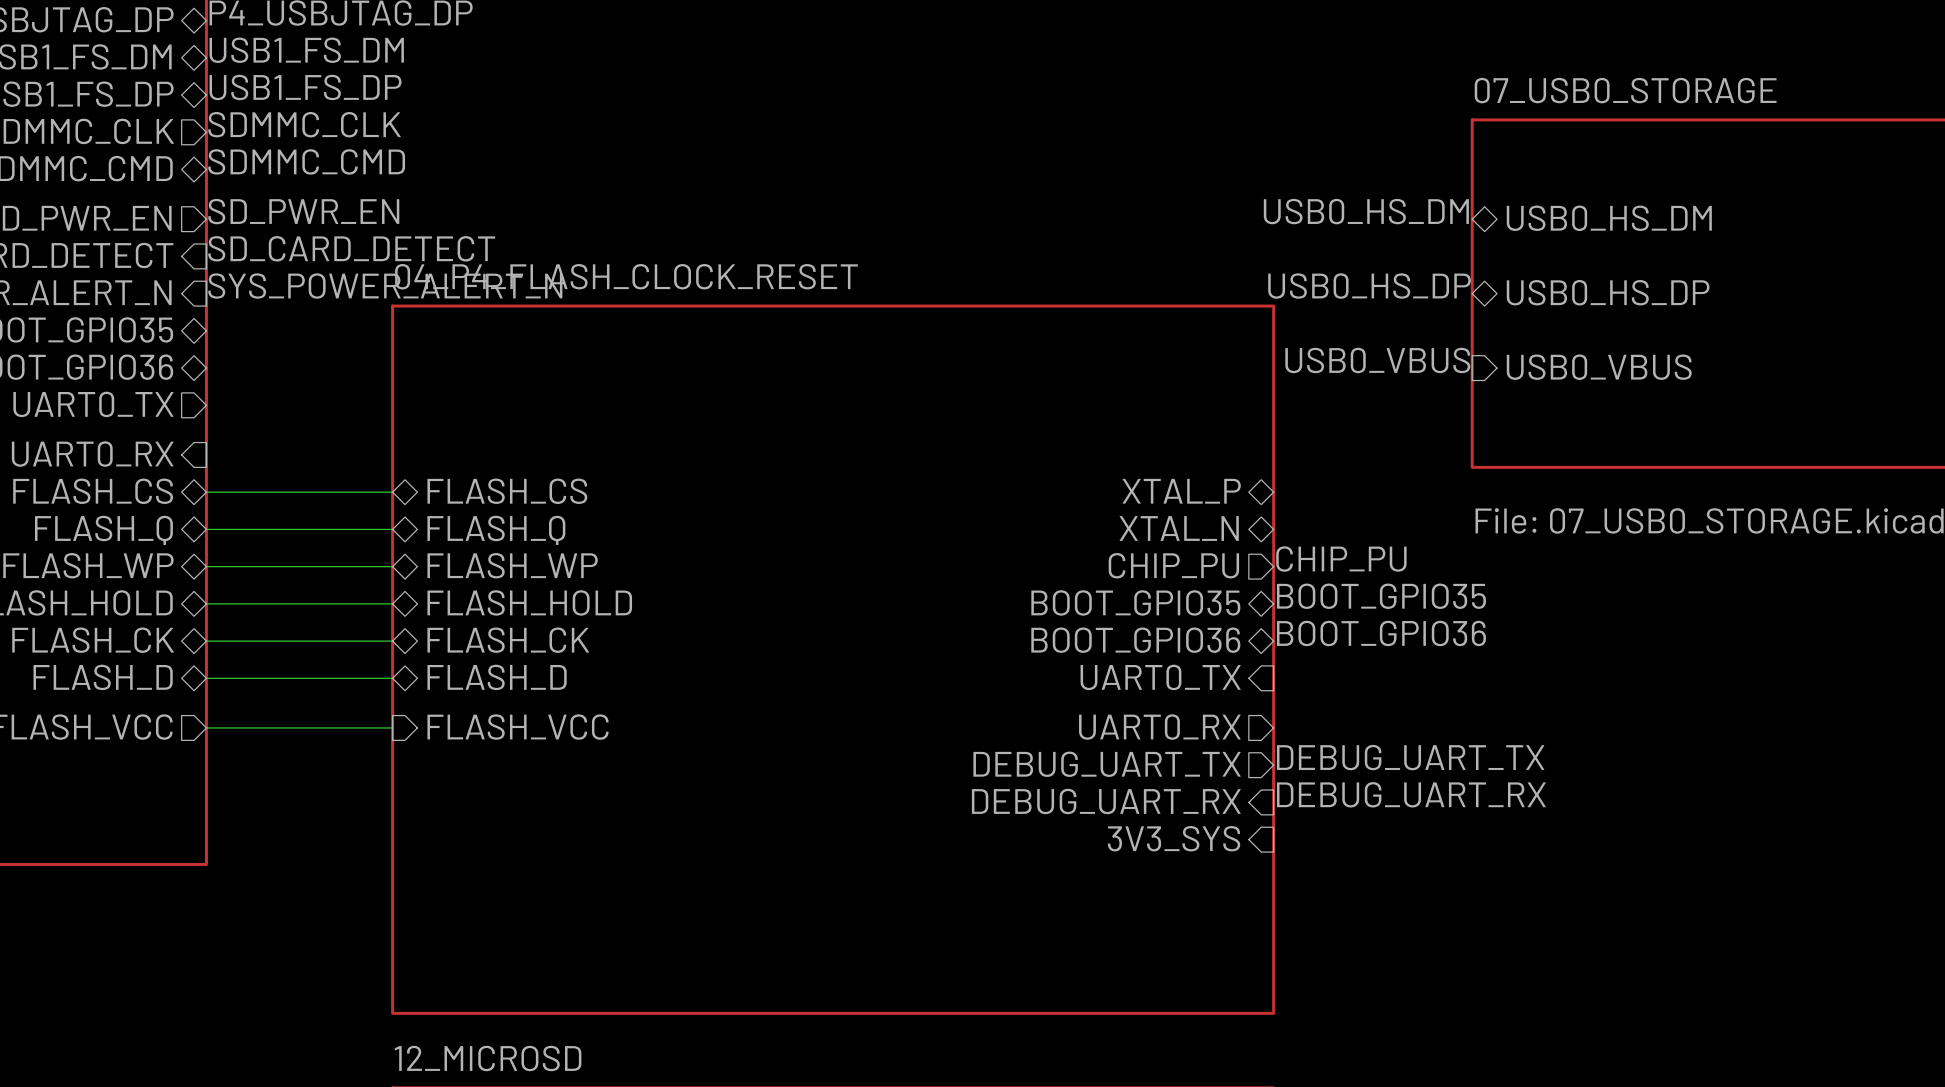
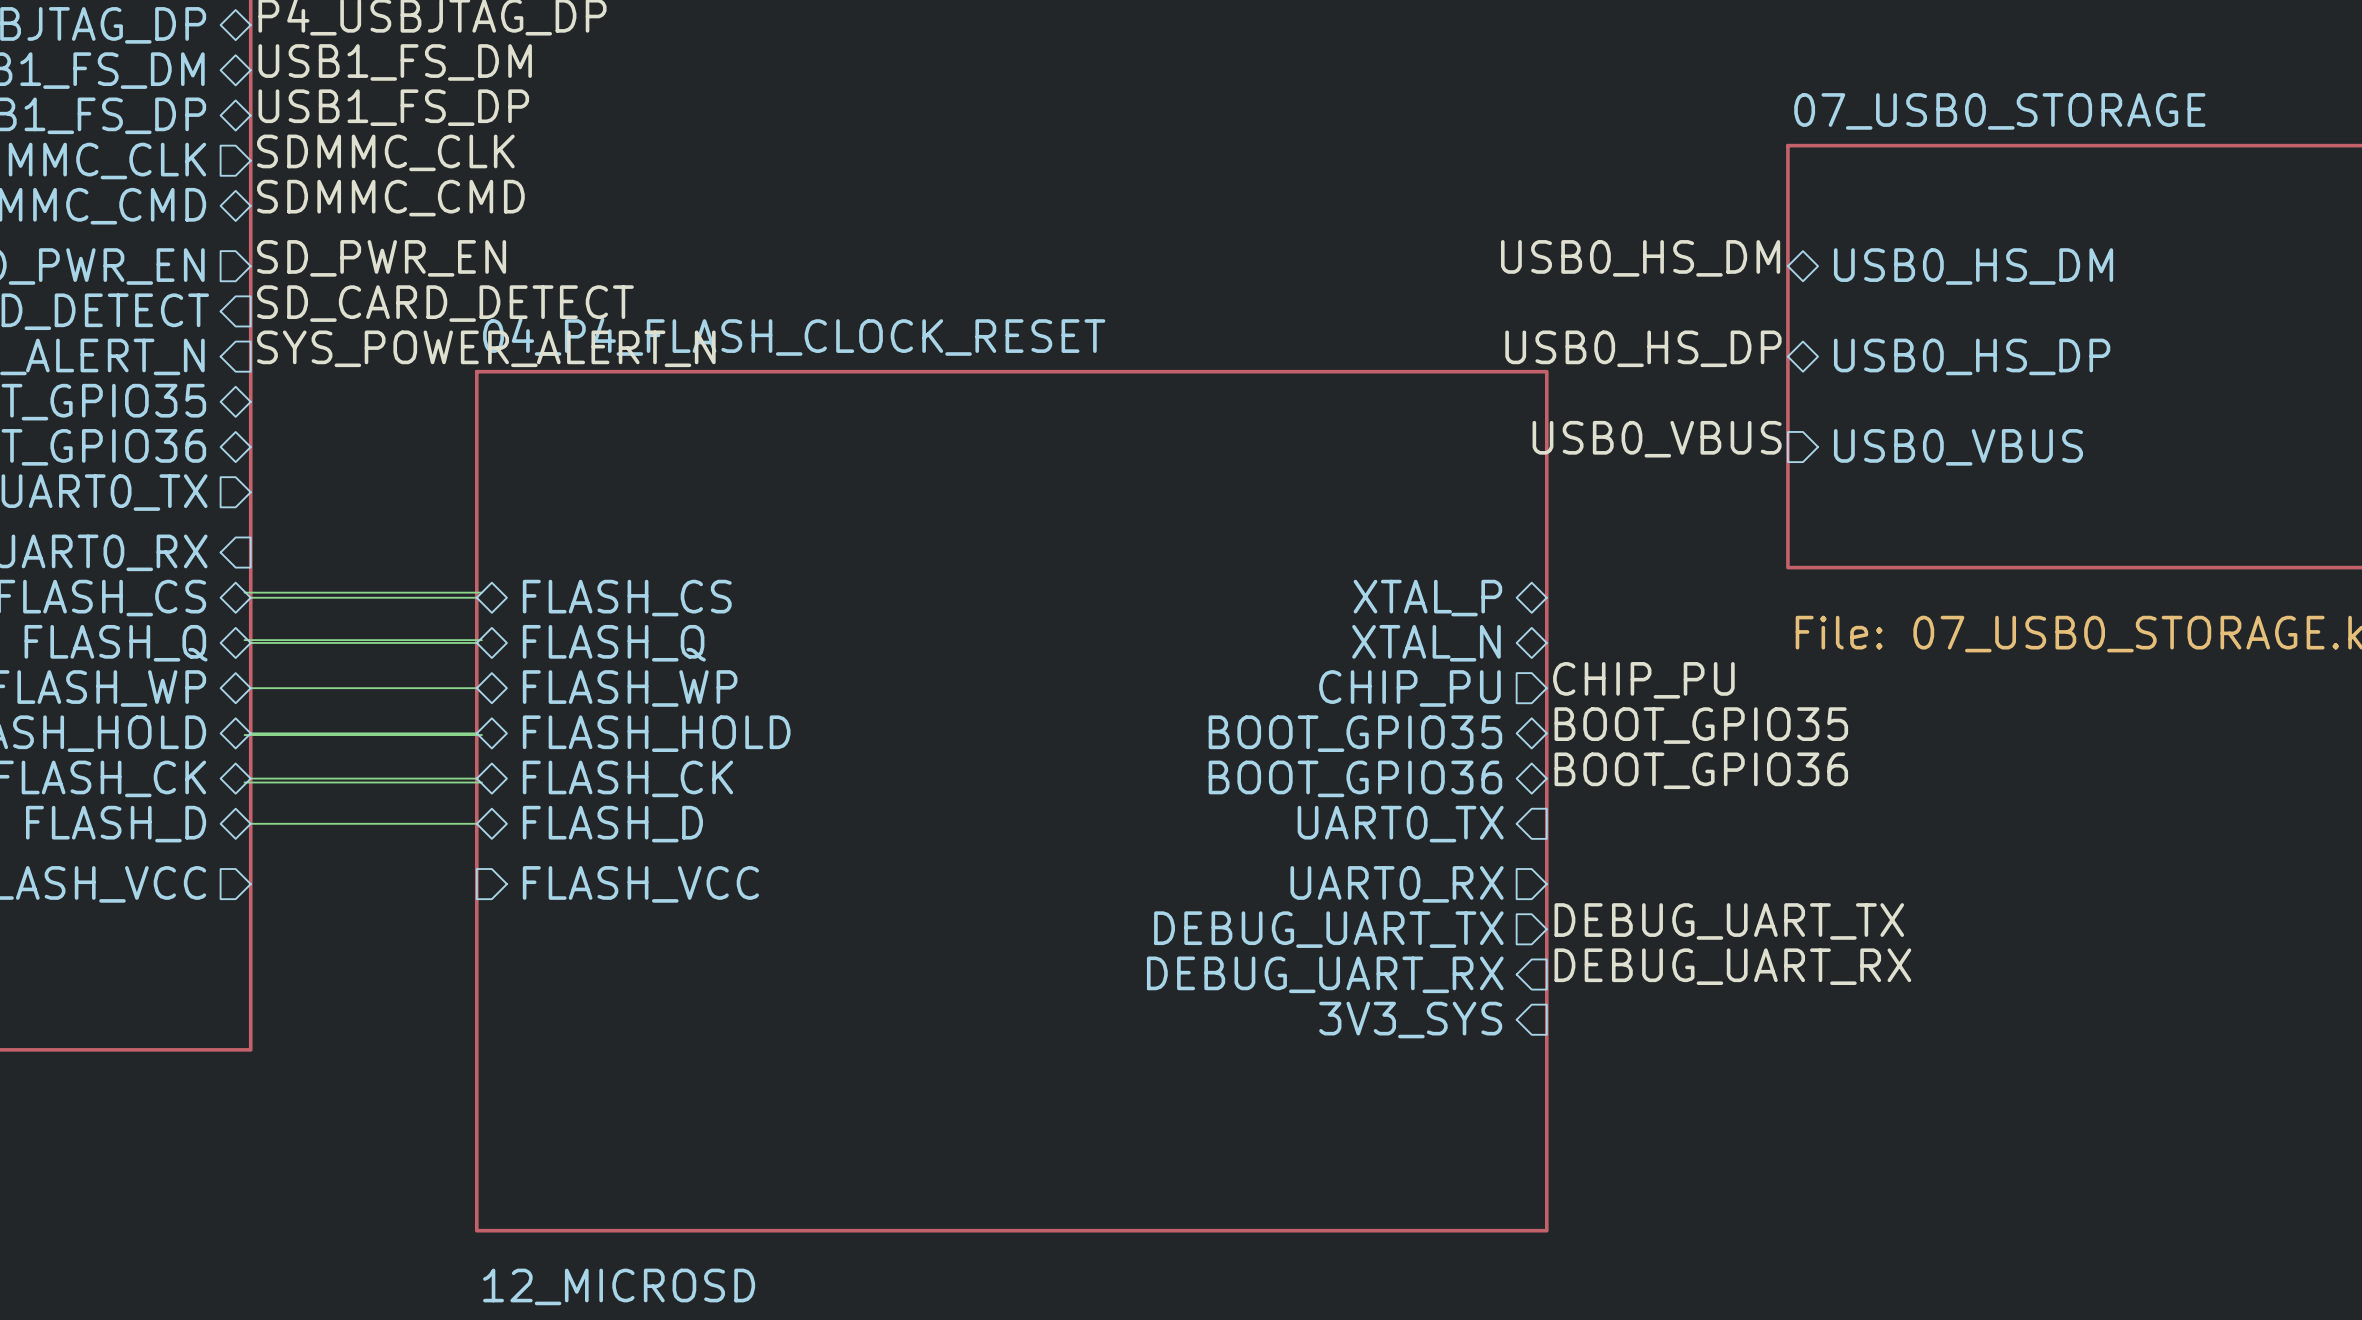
wire: none -> (244, 592) (481, 592)
wire: none -> (244, 640) (481, 640)
wire: none -> (244, 735) (481, 735)
wire: none -> (244, 782) (481, 782)
wire: (206, 727) (392, 727) -> none

